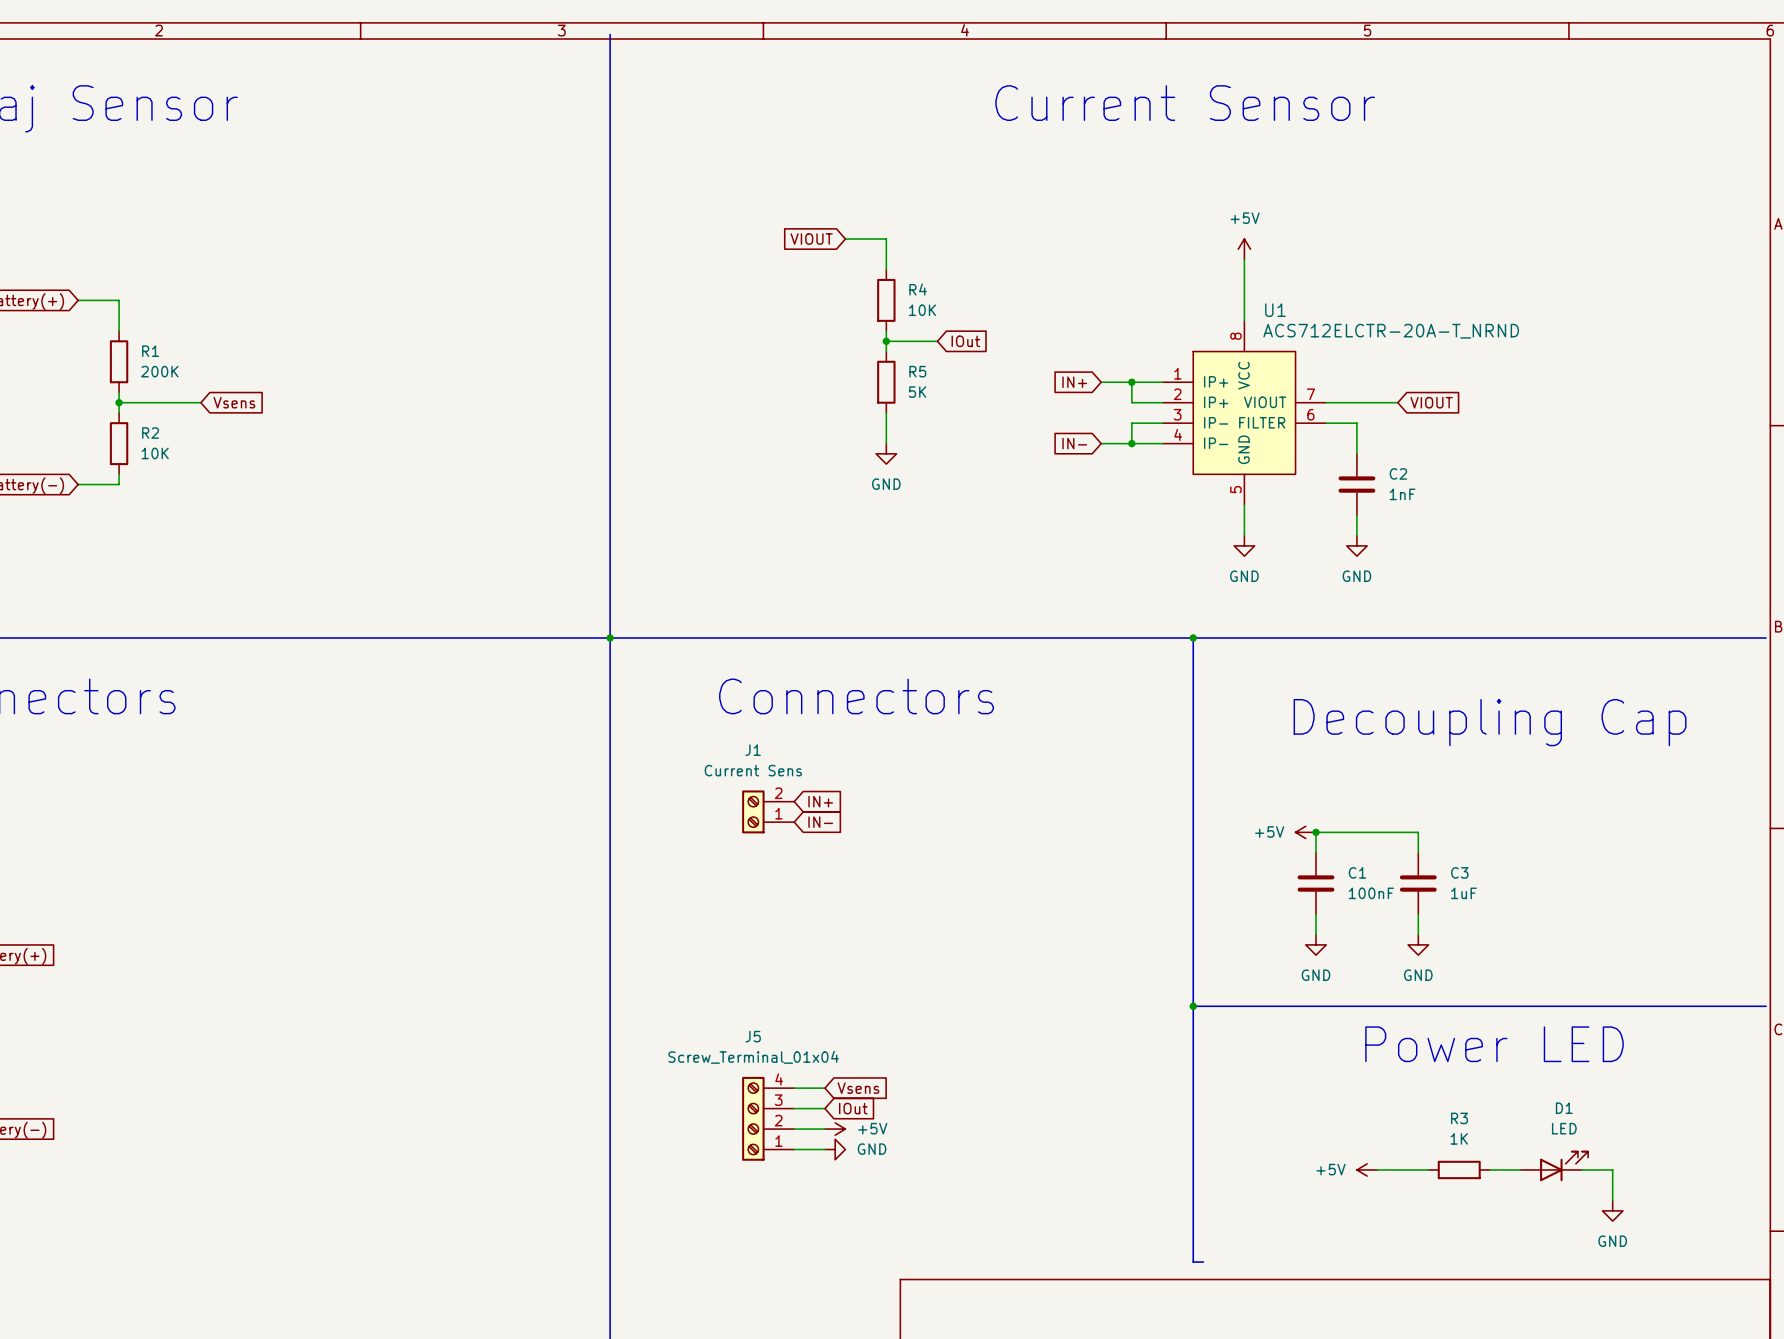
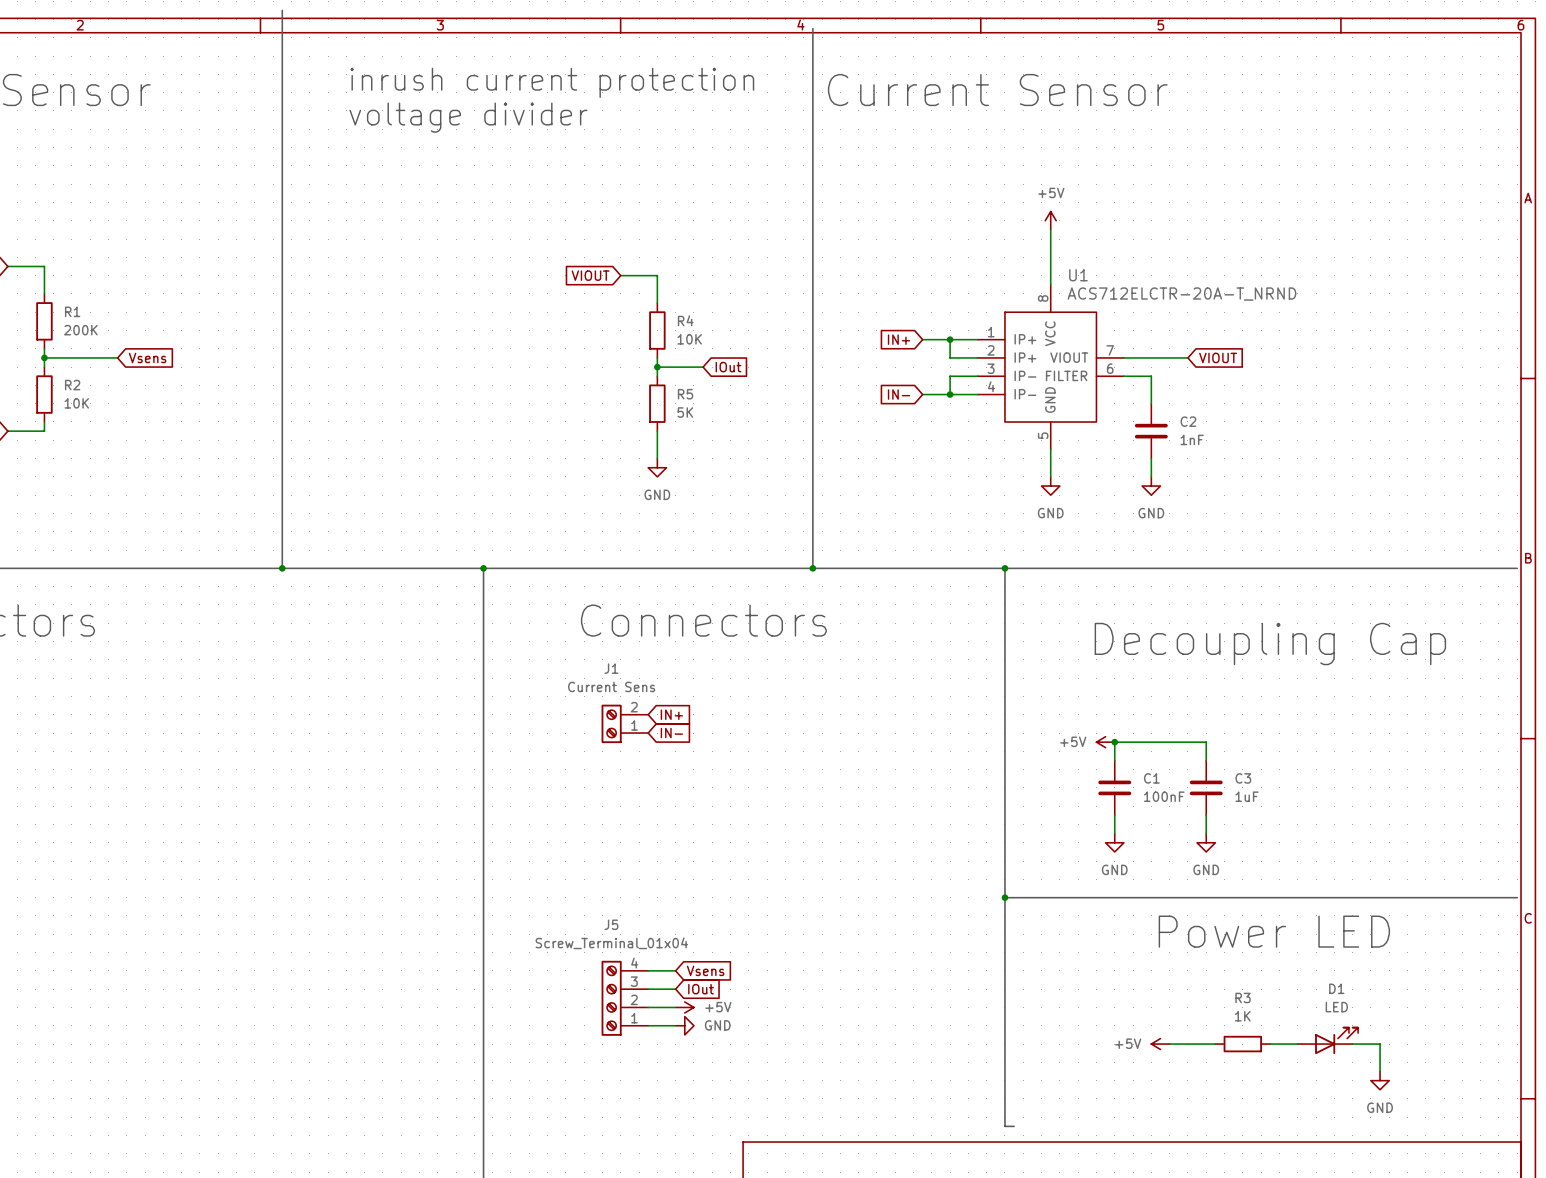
bus: none -> (282, 10) (282, 568)
bus: (610, 34) (610, 638) -> none
bus: none -> (812, 28) (812, 568)
text: none -> inrush current protection (552, 82)
text: none -> voltage divider (468, 117)
global label position: VIOUT (811, 239) -> VIOUT (590, 275)
wire: (845, 239) (886, 239) (886, 269) -> (620, 275) (657, 275) (657, 303)
R4 position: (886, 300) -> (657, 330)
wire: (886, 331) (886, 351) -> (657, 357) (657, 376)
wire: (886, 341) (937, 341) -> (657, 367) (703, 367)
junction: (886, 341) -> none
global label position: IOut (965, 341) -> IOut (728, 367)
R5 position: (886, 382) -> (657, 403)
junction: none -> (657, 367)
wire: (886, 412) (886, 443) -> (657, 431) (657, 458)
power symbol position: GND (886, 453) -> GND (657, 467)
junction: none -> (282, 568)
junction: none -> (812, 568)

